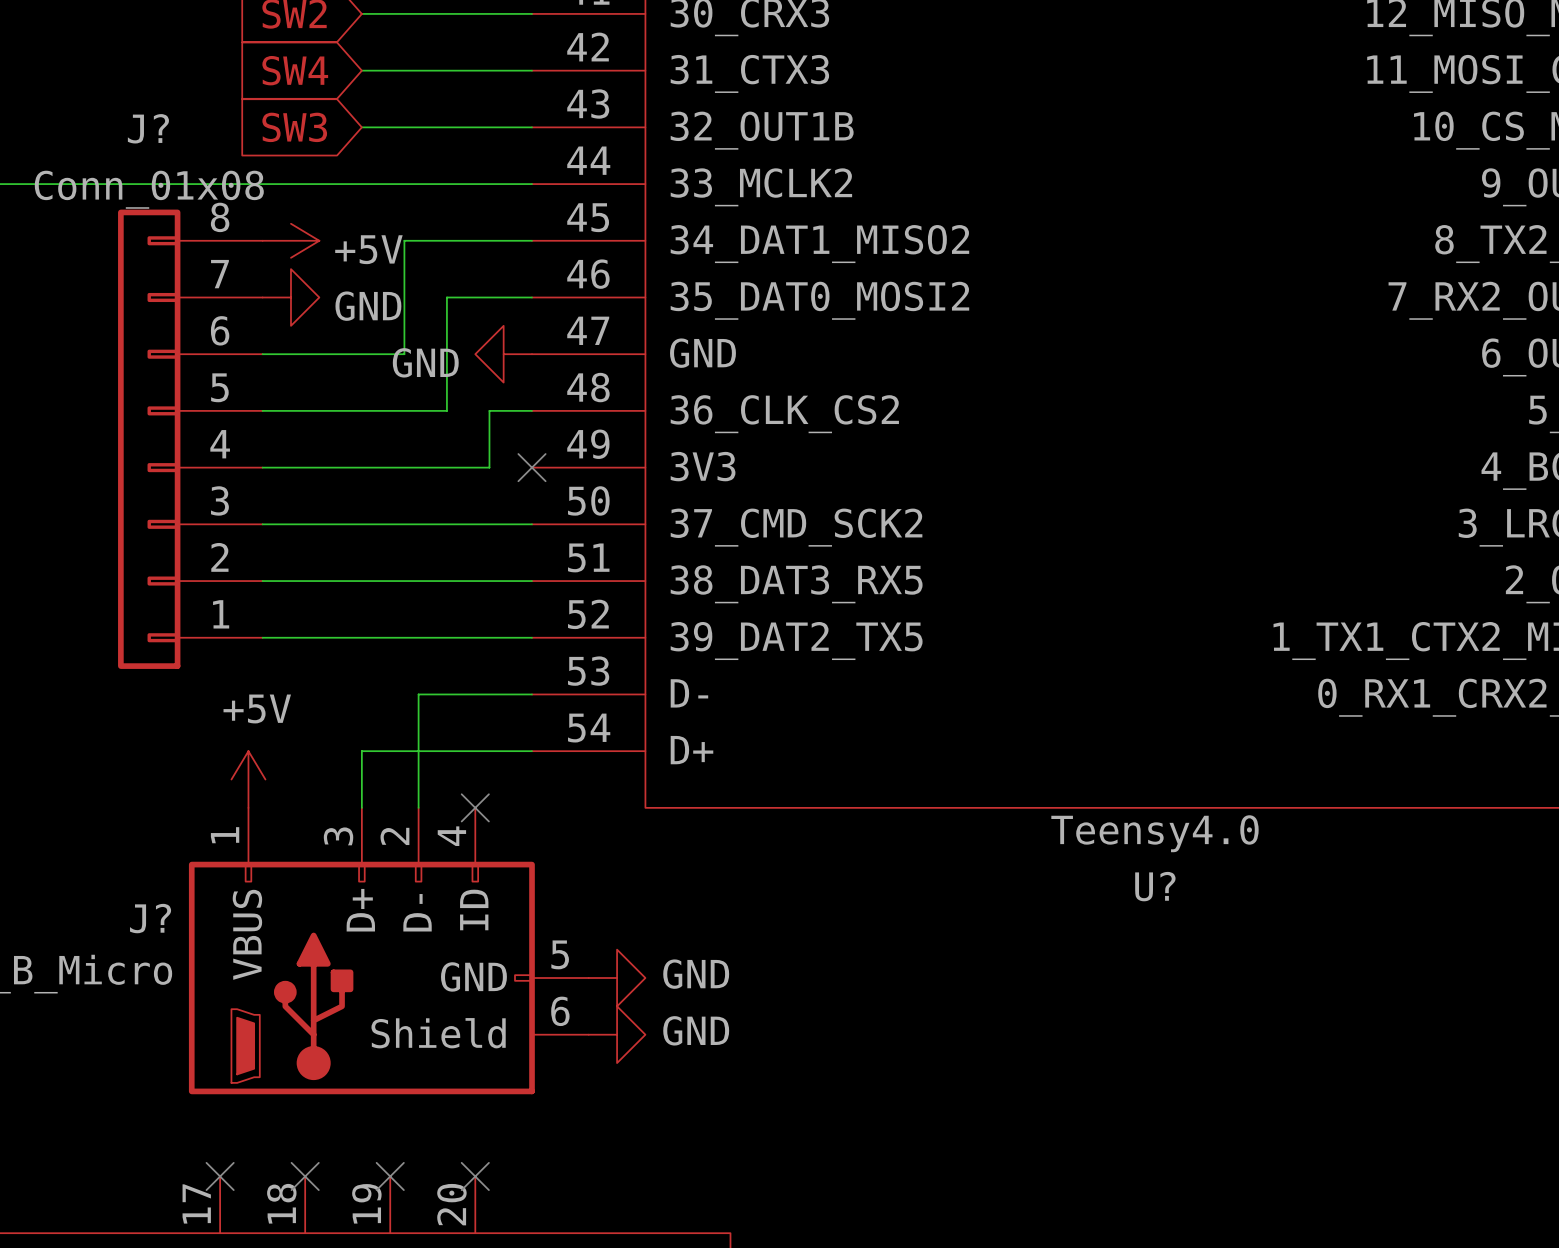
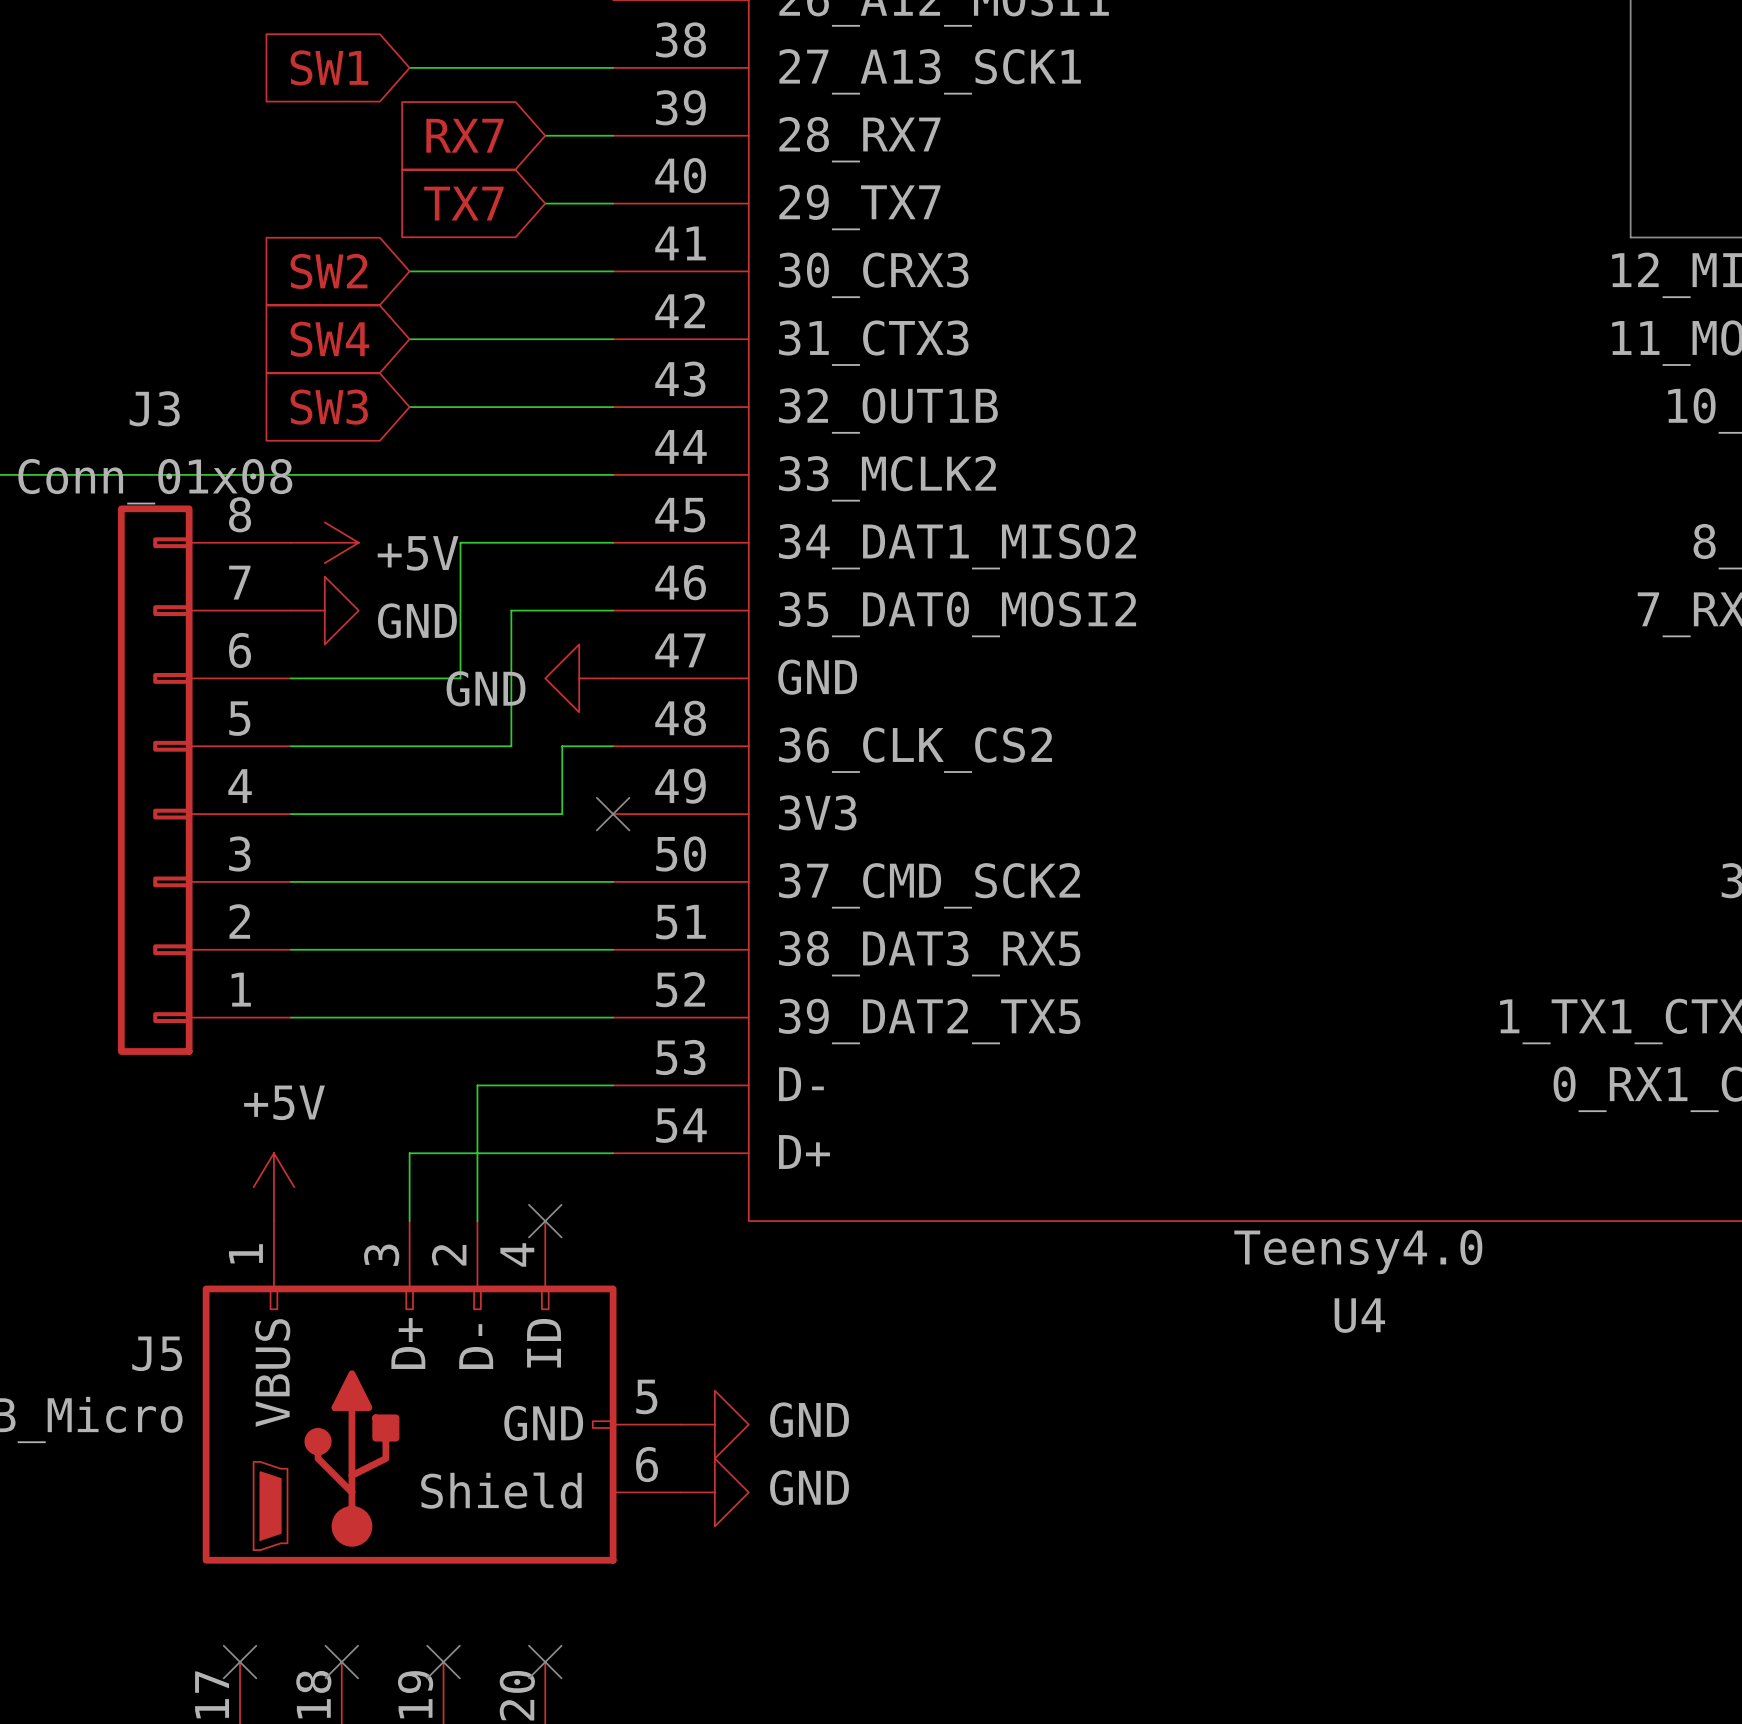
J? name: J? (148, 128) -> J3 (154, 408)
U? name: U? (1155, 886) -> U4 (1359, 1315)
J? name: J? (150, 918) -> J5 (157, 1353)

